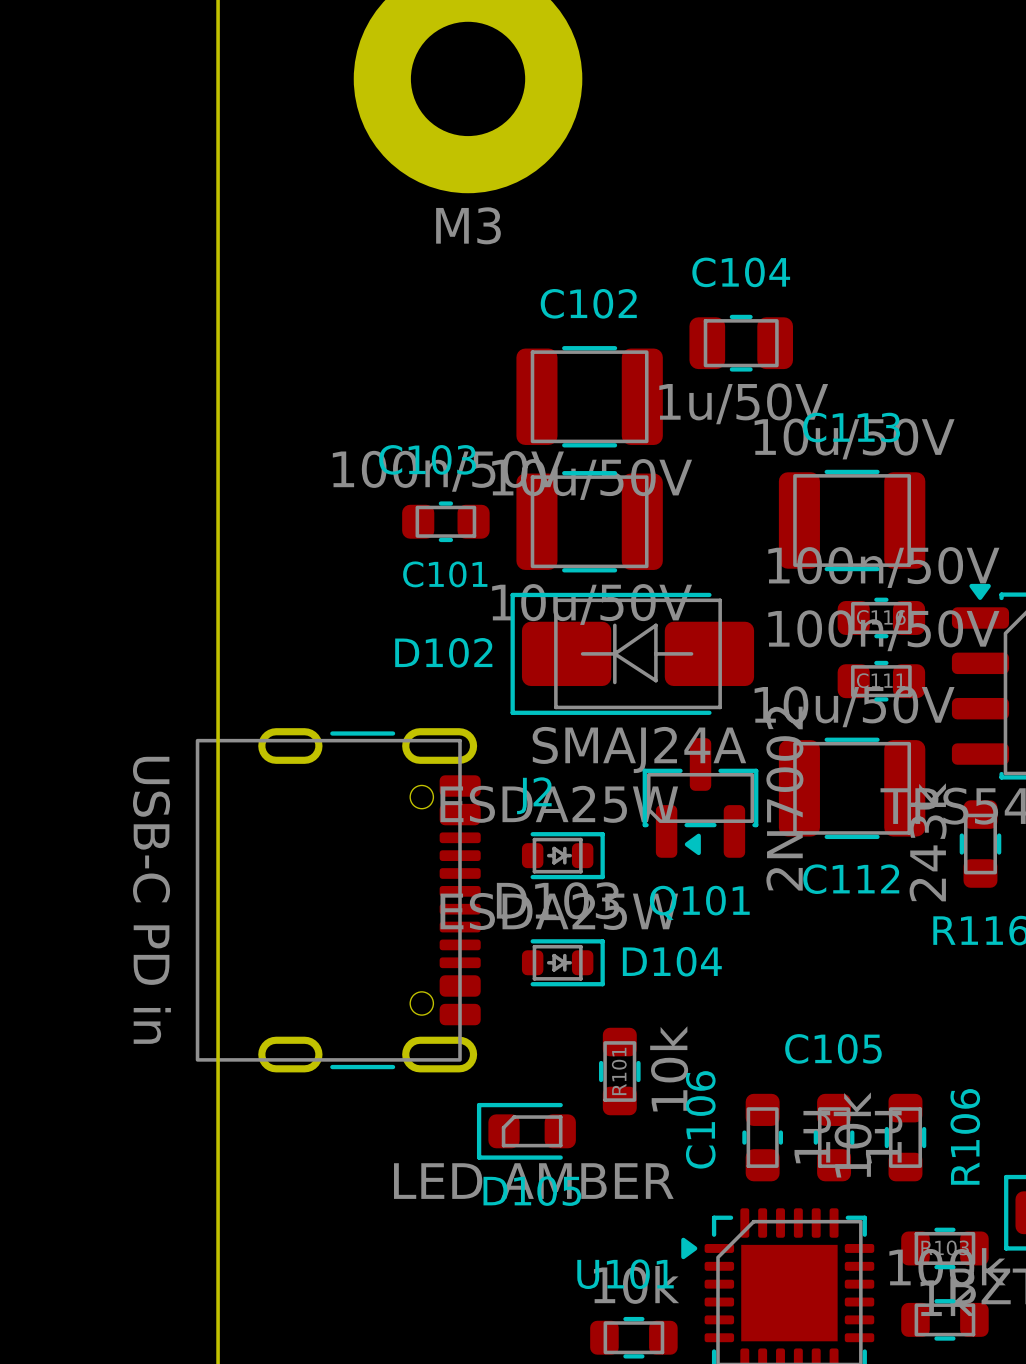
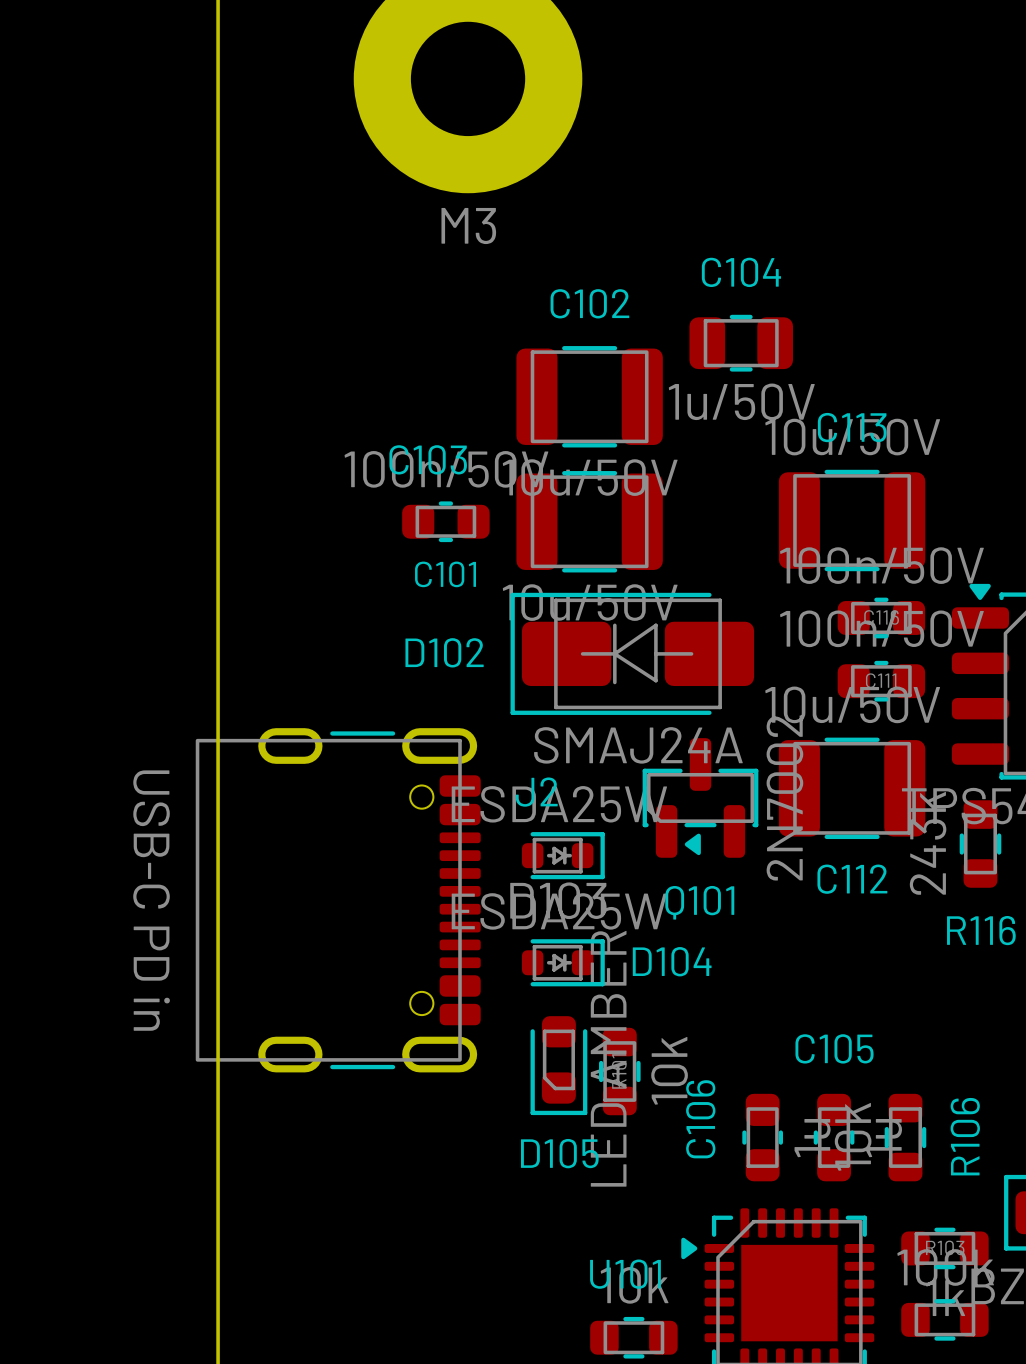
D105 rotation: 0° (526, 1131) -> 90° counterclockwise (558, 1065)
D105 position: (526, 1131) -> (558, 1065)

